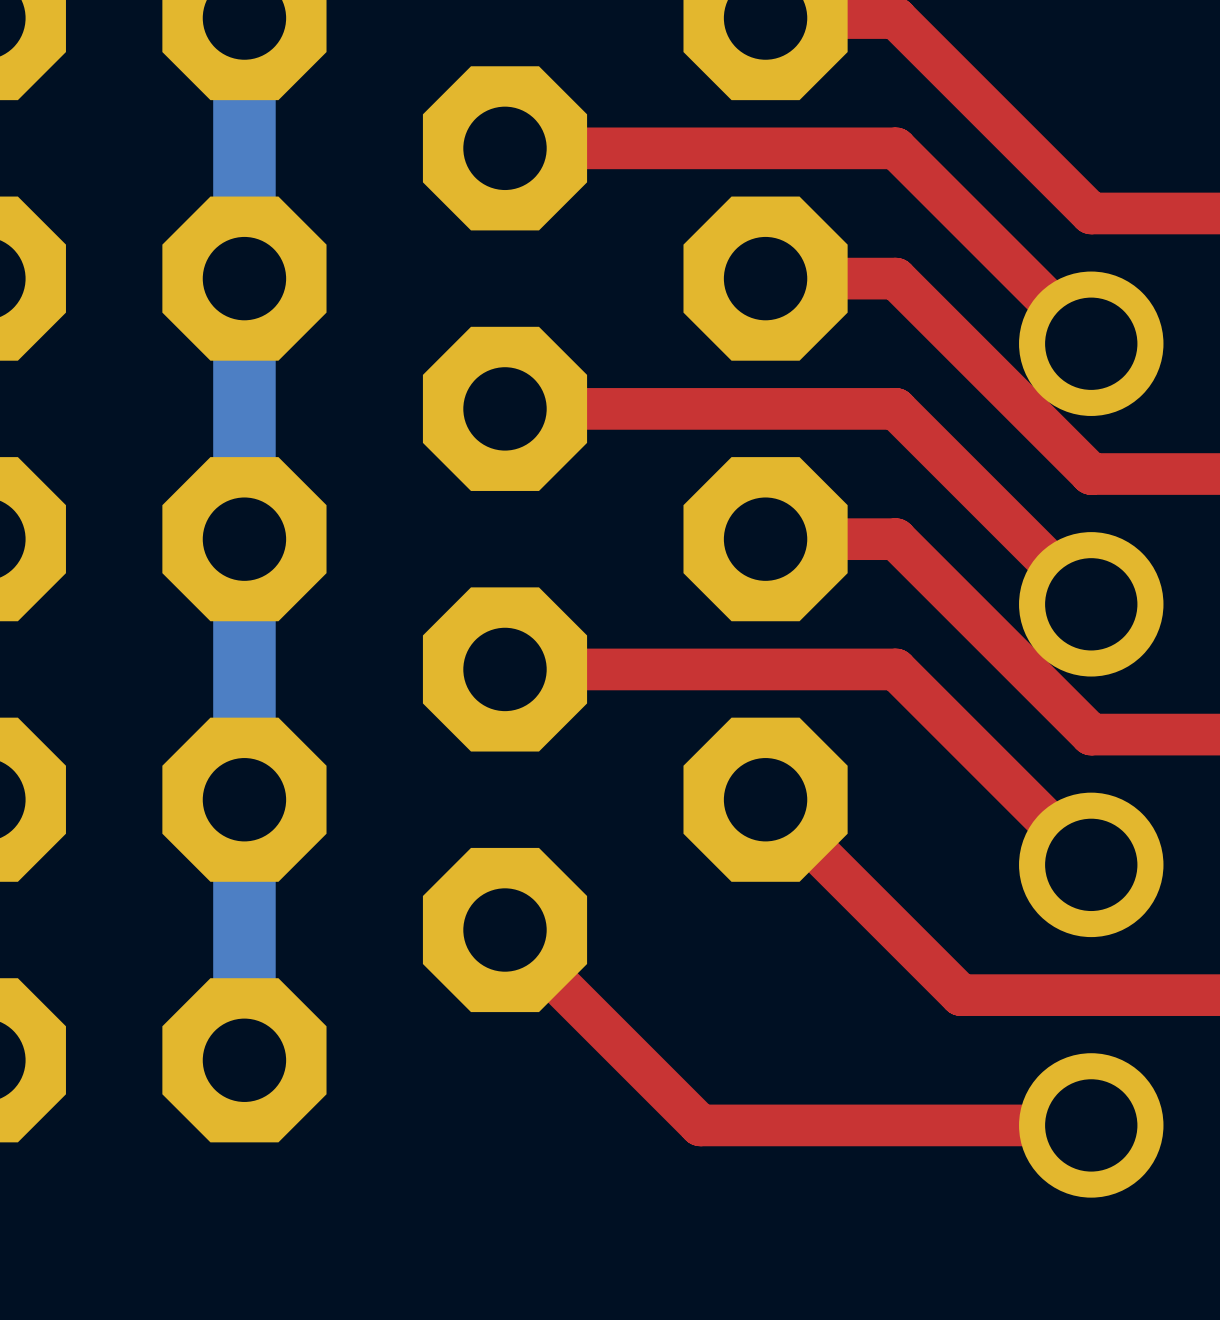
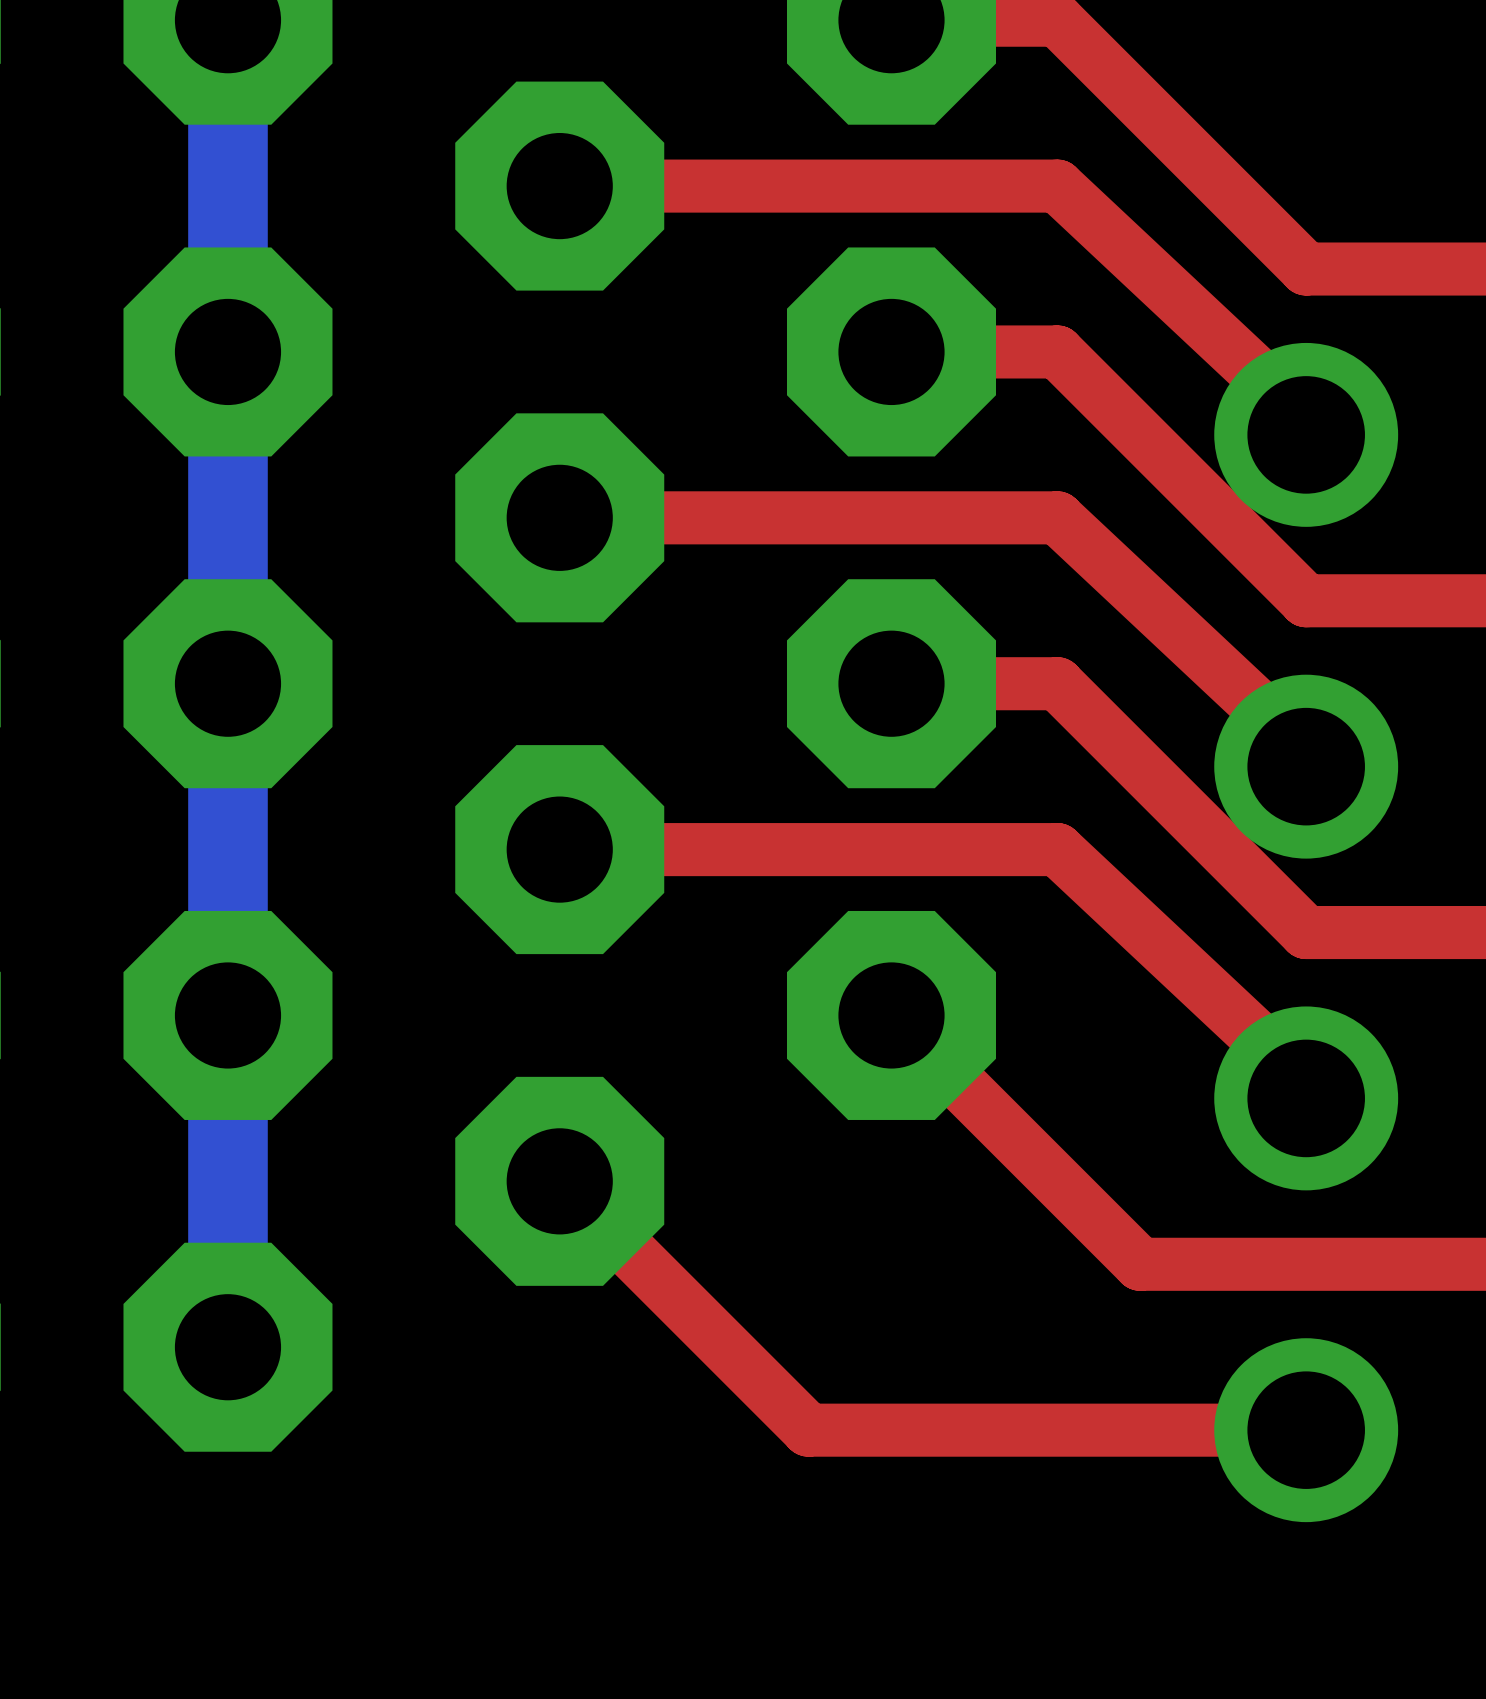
top track: (895, 148) (1091, 343) -> (1057, 186) (1322, 434)
top track: (895, 408) (1091, 604) -> (1057, 517) (1322, 766)
top track: (895, 669) (1091, 864) -> (1057, 849) (1322, 1098)

